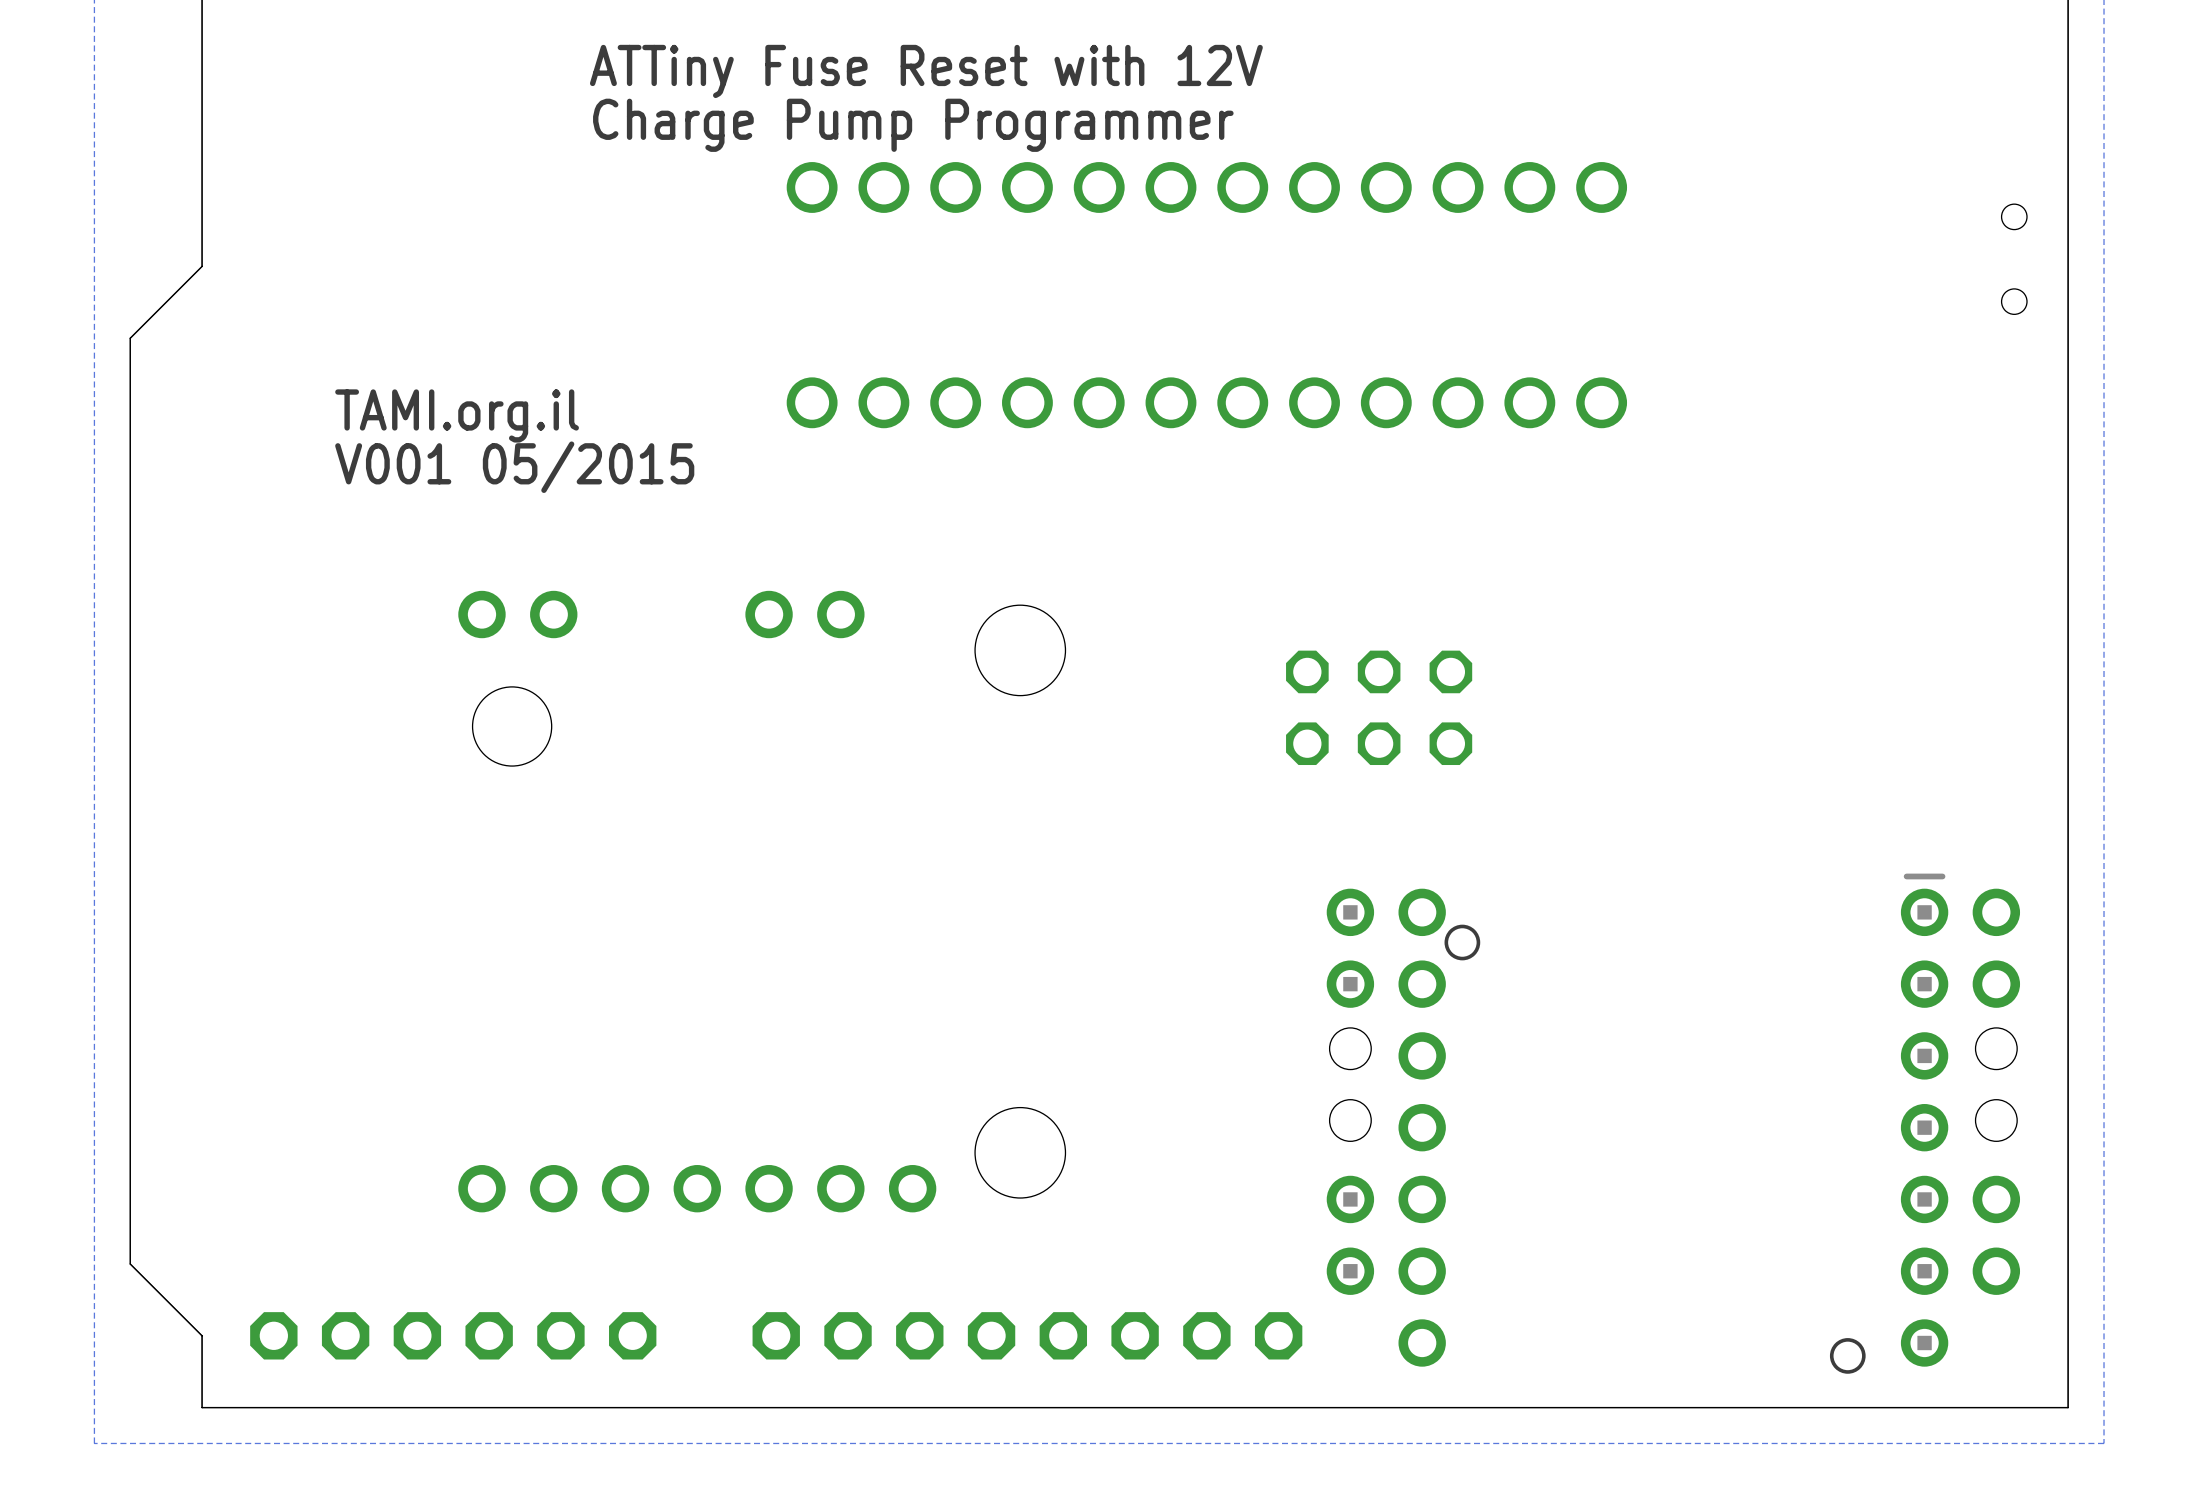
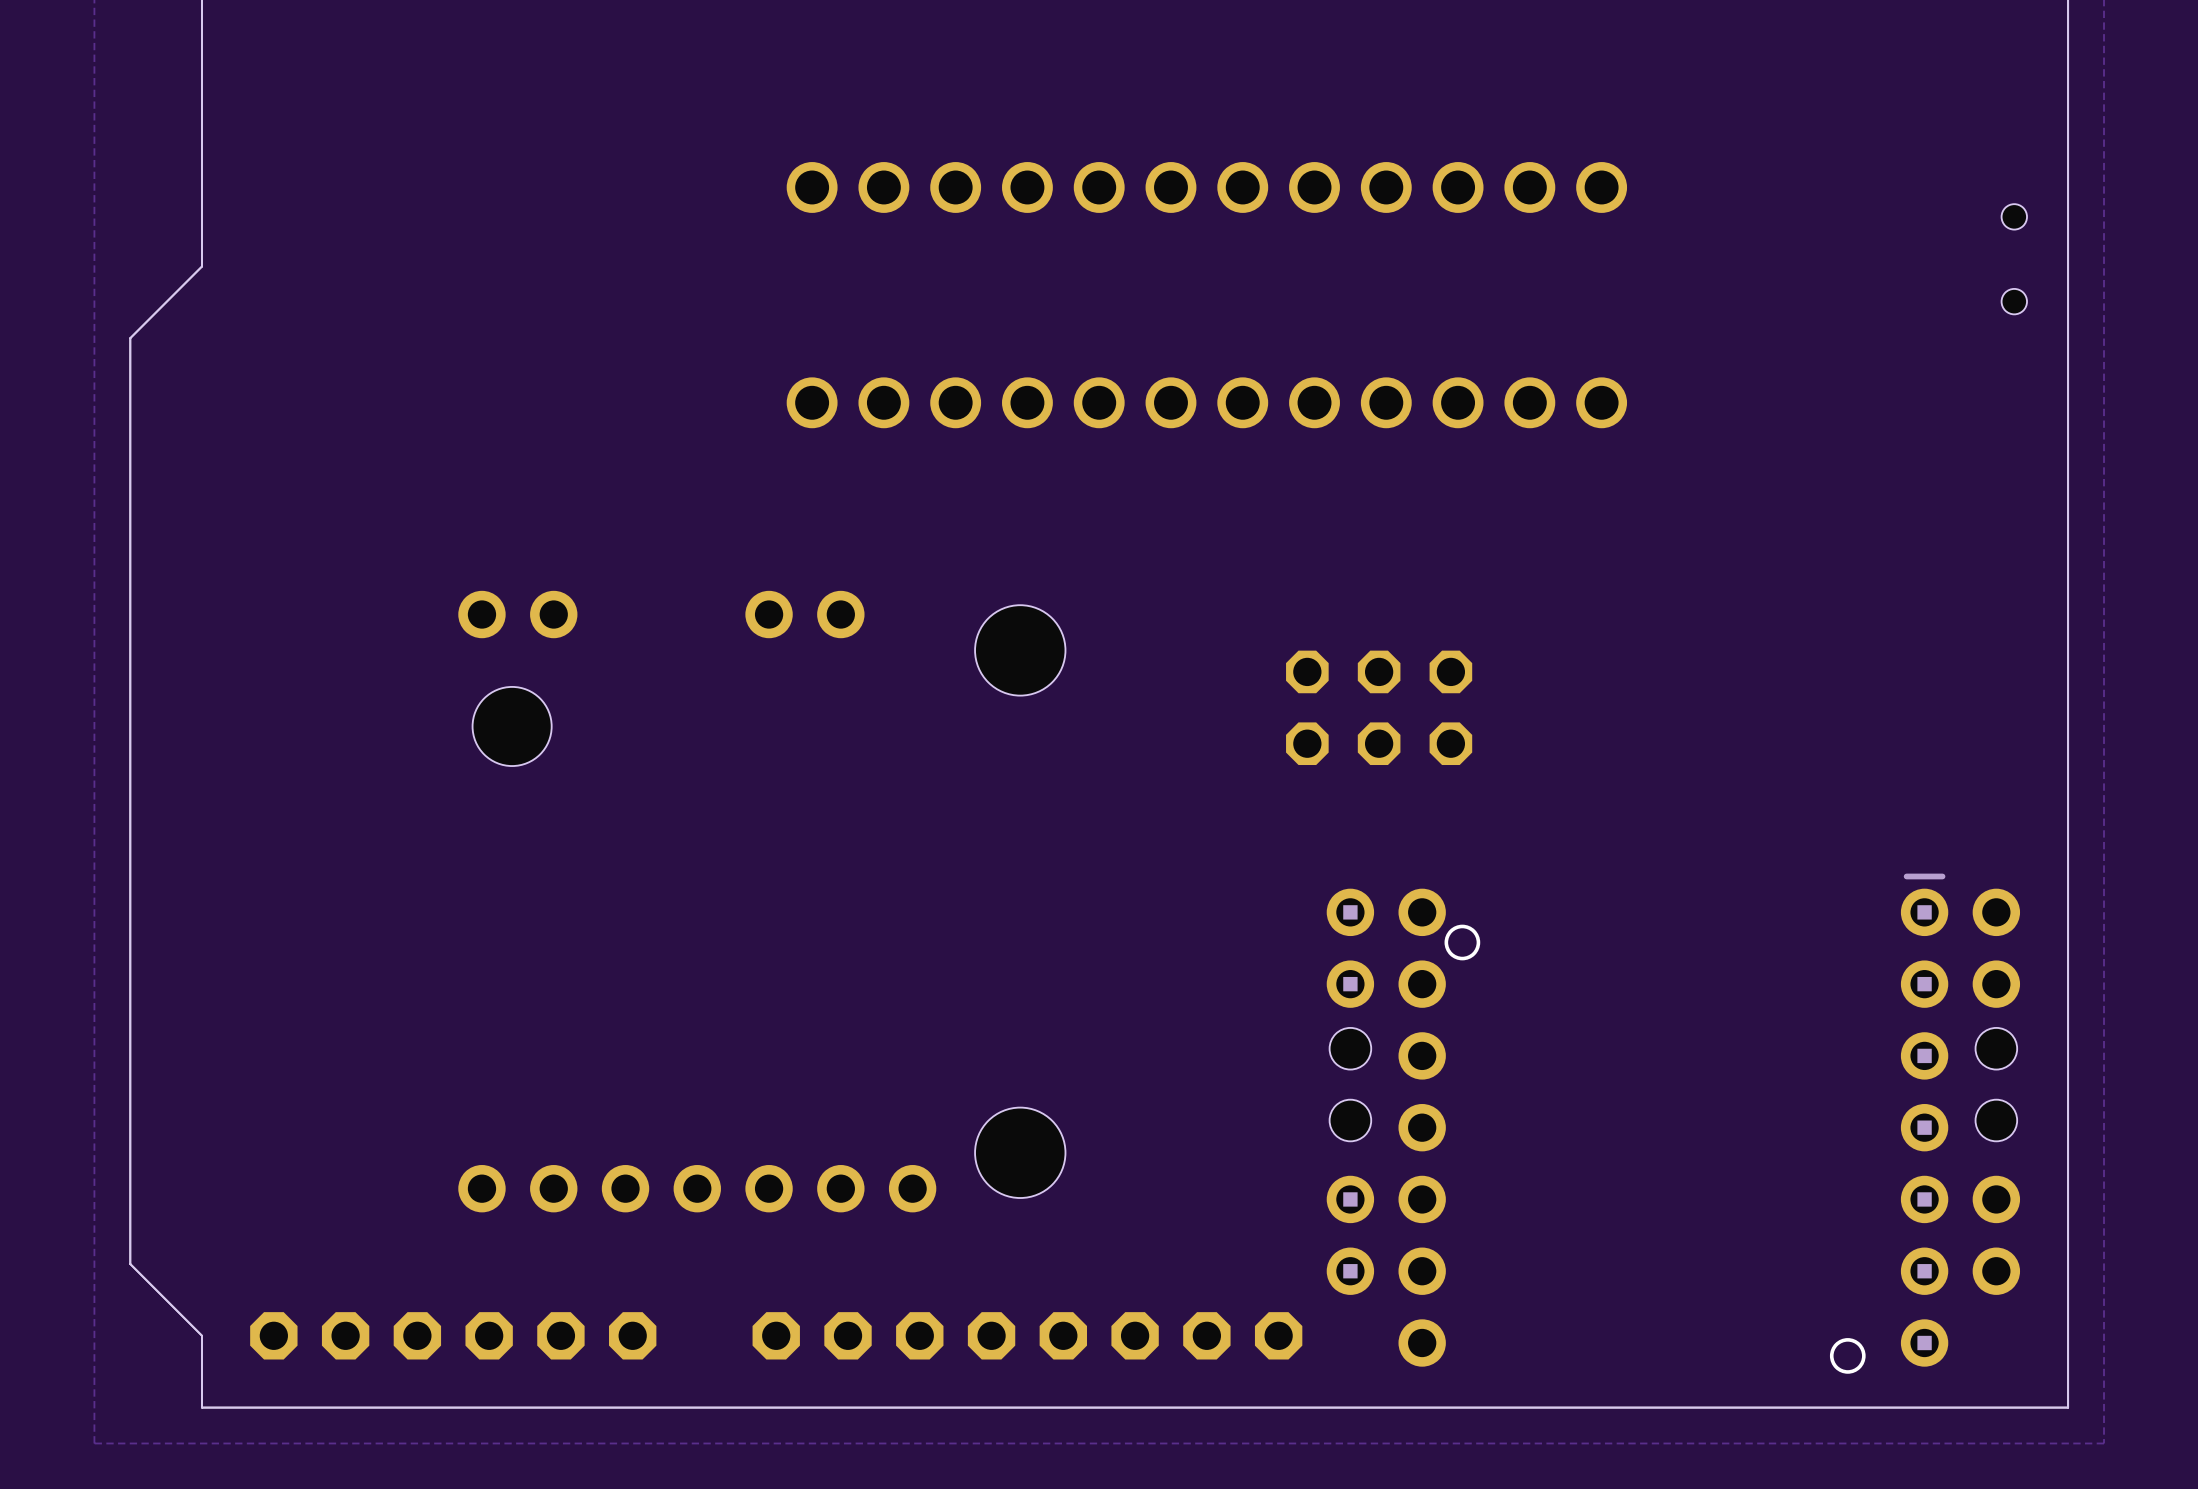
text: ATTiny Fuse Reset with 12V (926, 71) -> none
text: Charge Pump Programmer (913, 125) -> none
text: TAMI.org.il (457, 415) -> none
text: V001 05/2015 (514, 467) -> none

